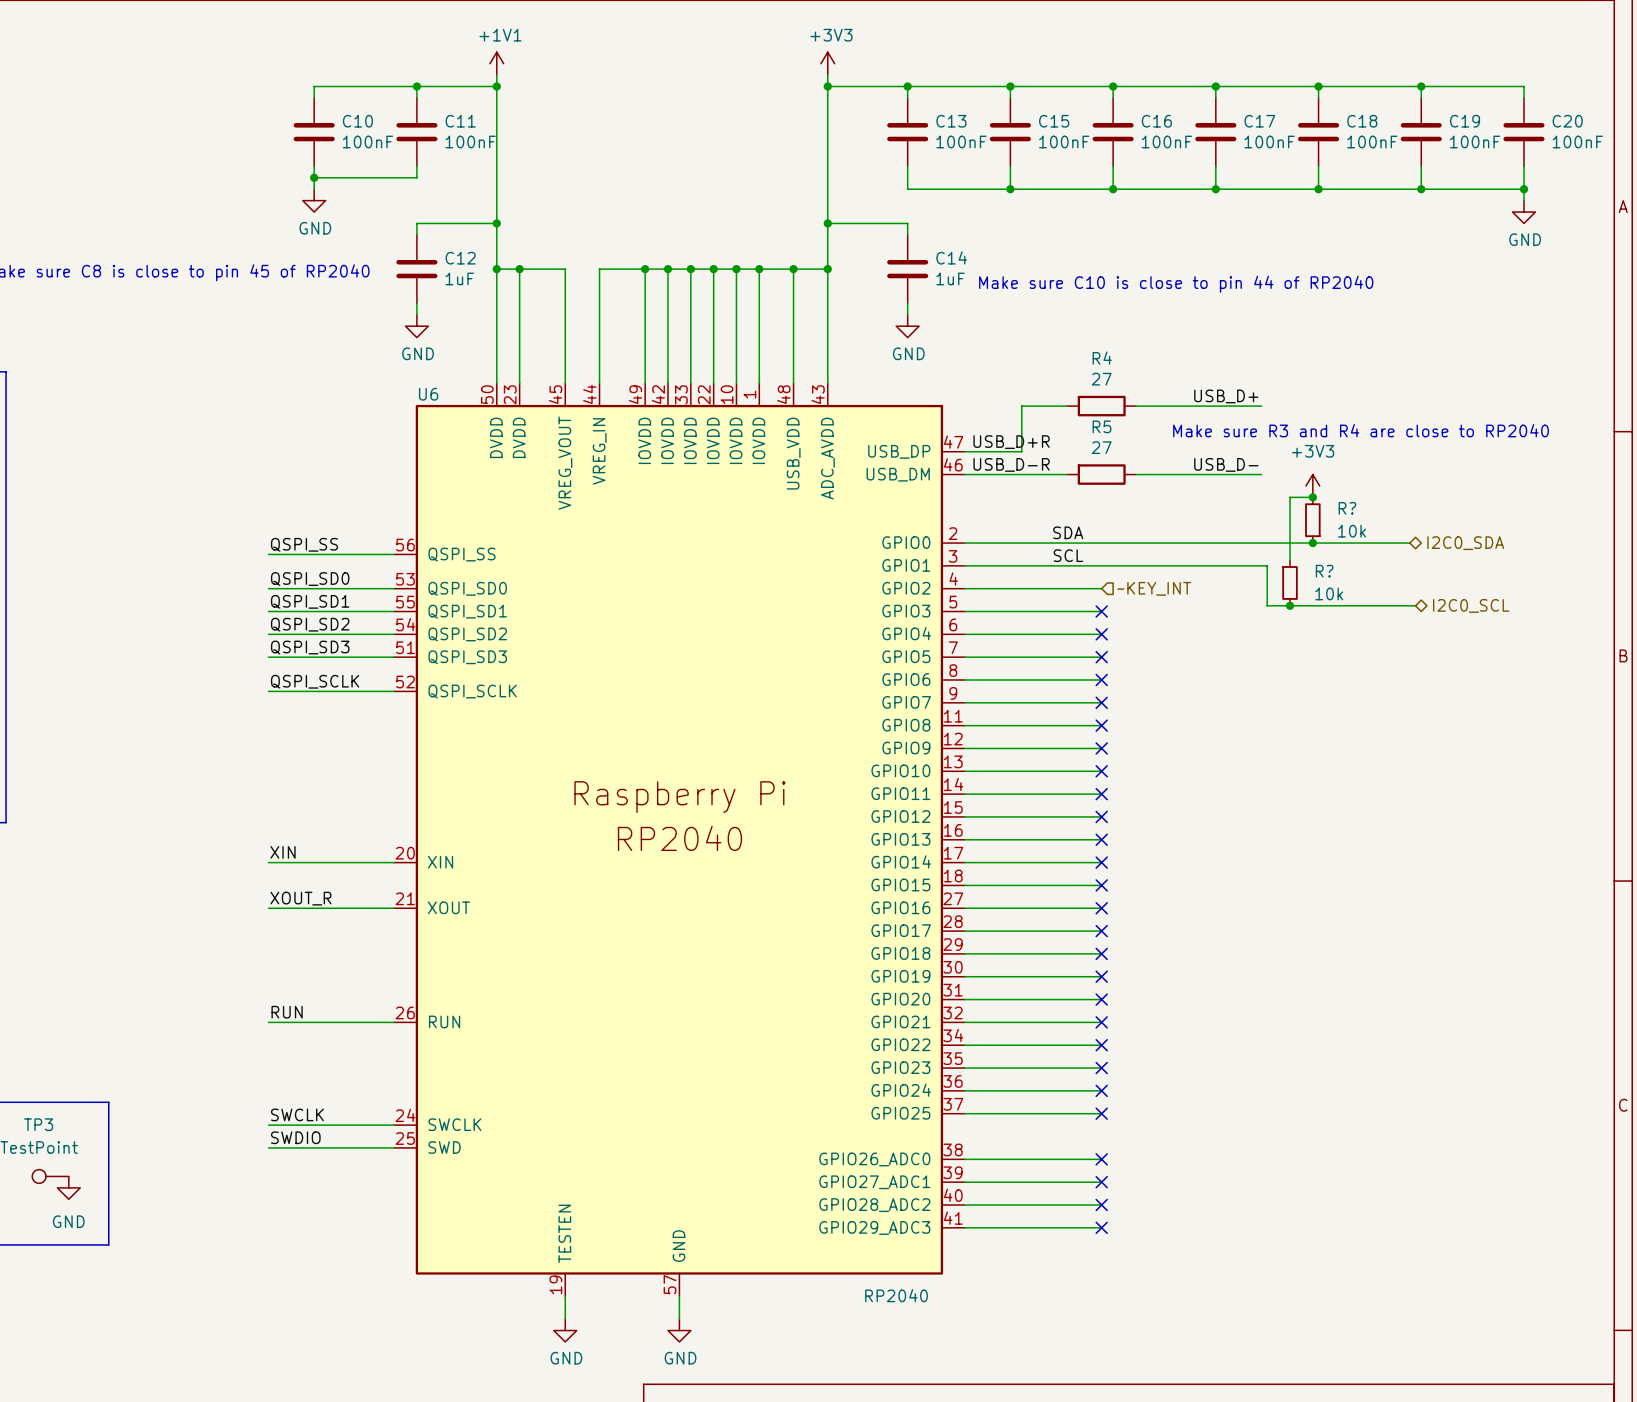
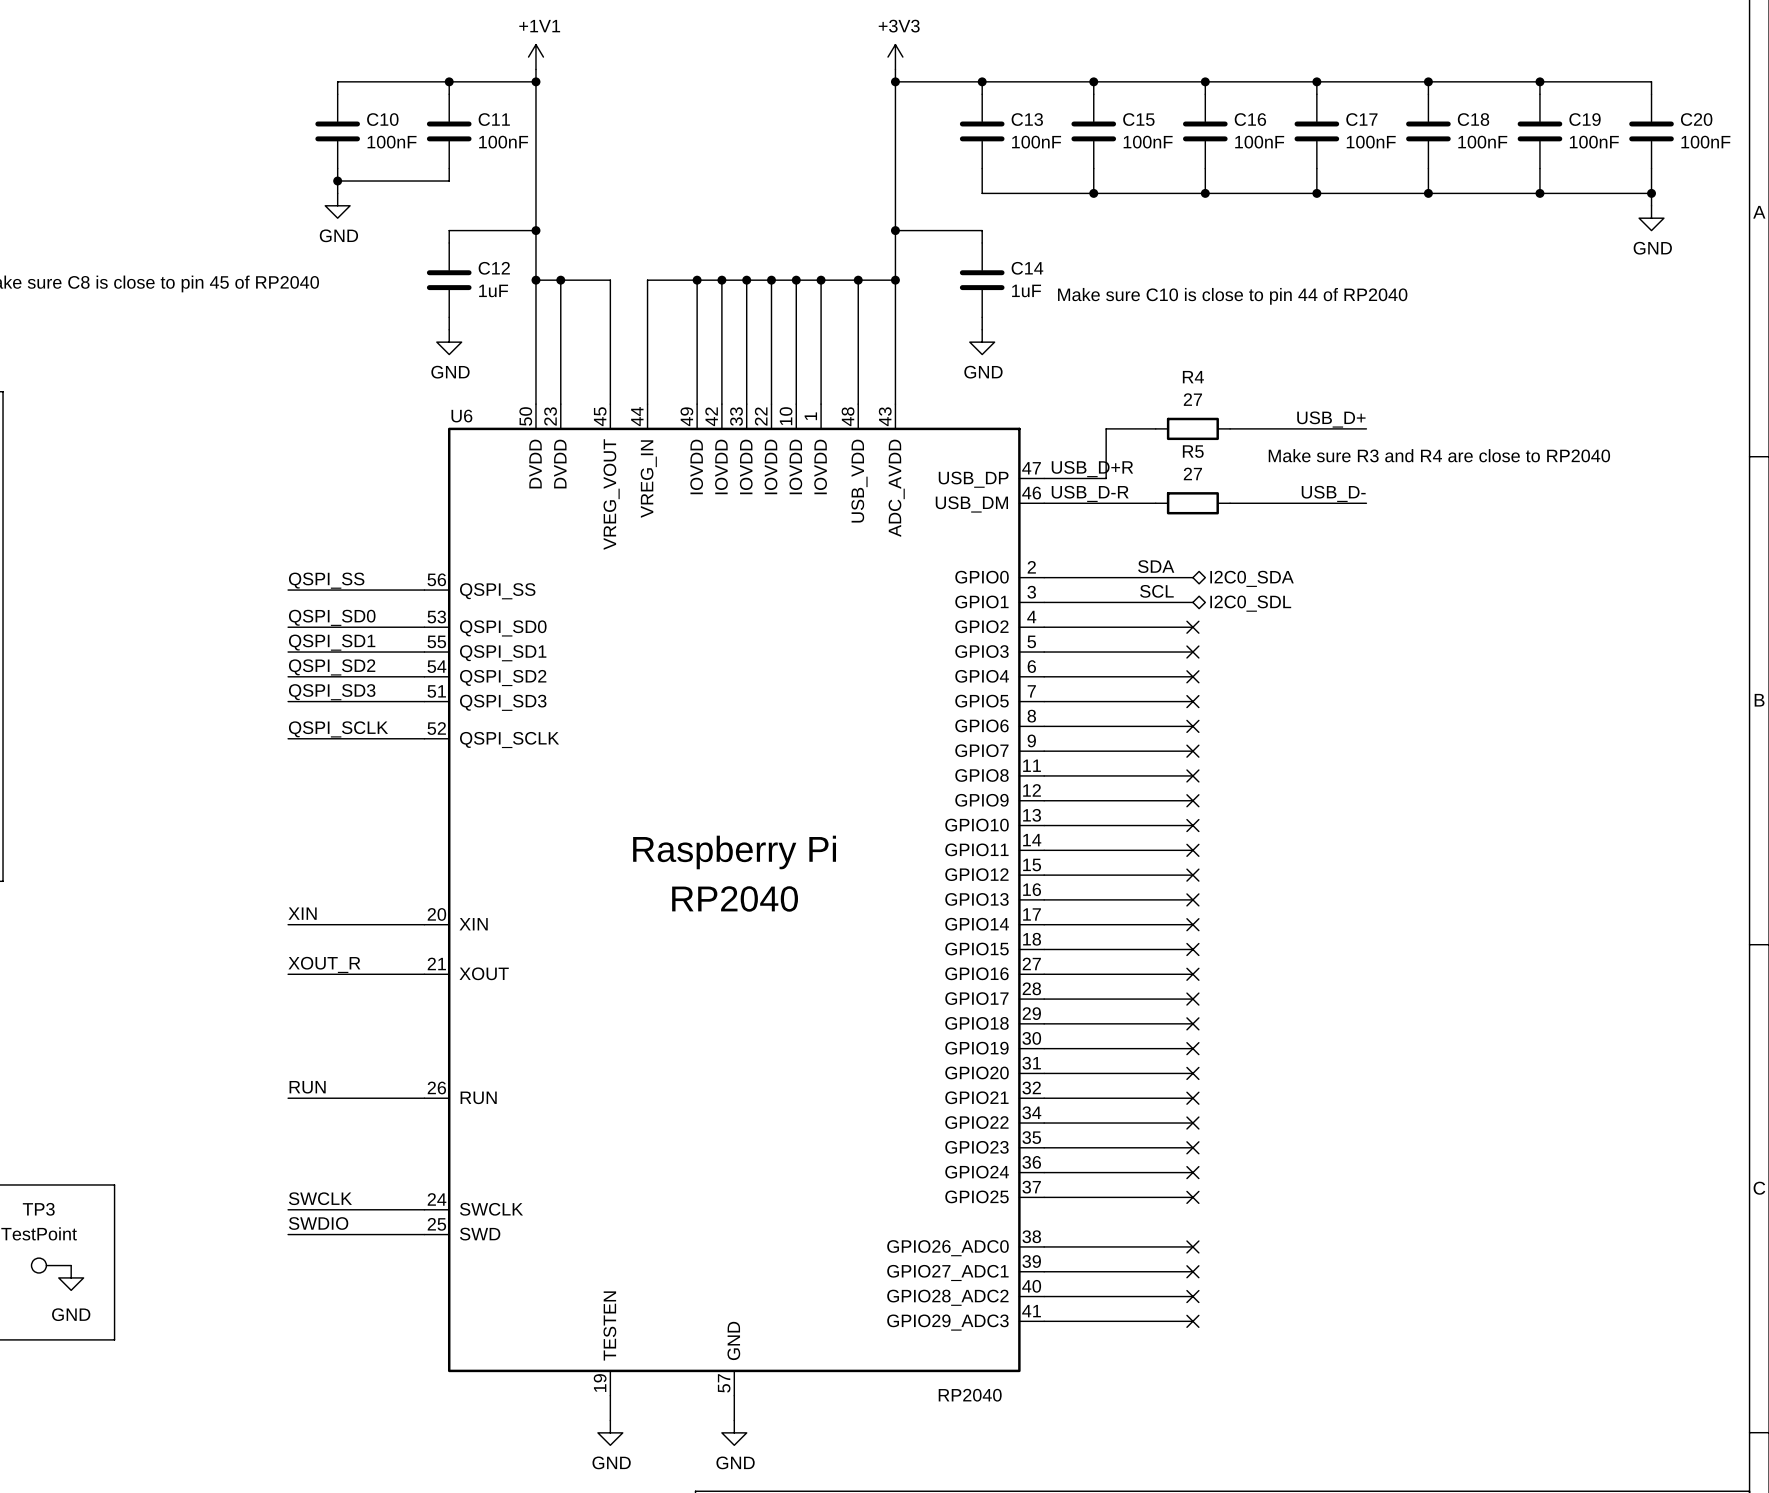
power symbol: +3V3 (1312, 485) -> none
wire: (1312, 497) (1290, 497) (1290, 560) -> none
junction: (1312, 497) -> none
R?: 10k (1312, 520) -> none
wire: (1101, 543) (1409, 543) -> none
hierarchical label: none -> I2C0_SDA (1252, 578)
junction: (1312, 543) -> none
hierarchical label: I2C0_SDA (1465, 543) -> none
wire: (1101, 565) (1267, 565) (1267, 605) (1415, 605) -> none
hierarchical label: none -> I2C0_SDL (1250, 603)
R?: 10k (1290, 582) -> none
no-connect mark: none -> (1192, 627)
hierarchical label: ~KEY_INT (1154, 588) -> none
junction: (1290, 605) -> none
hierarchical label: I2C0_SCL (1471, 605) -> none

